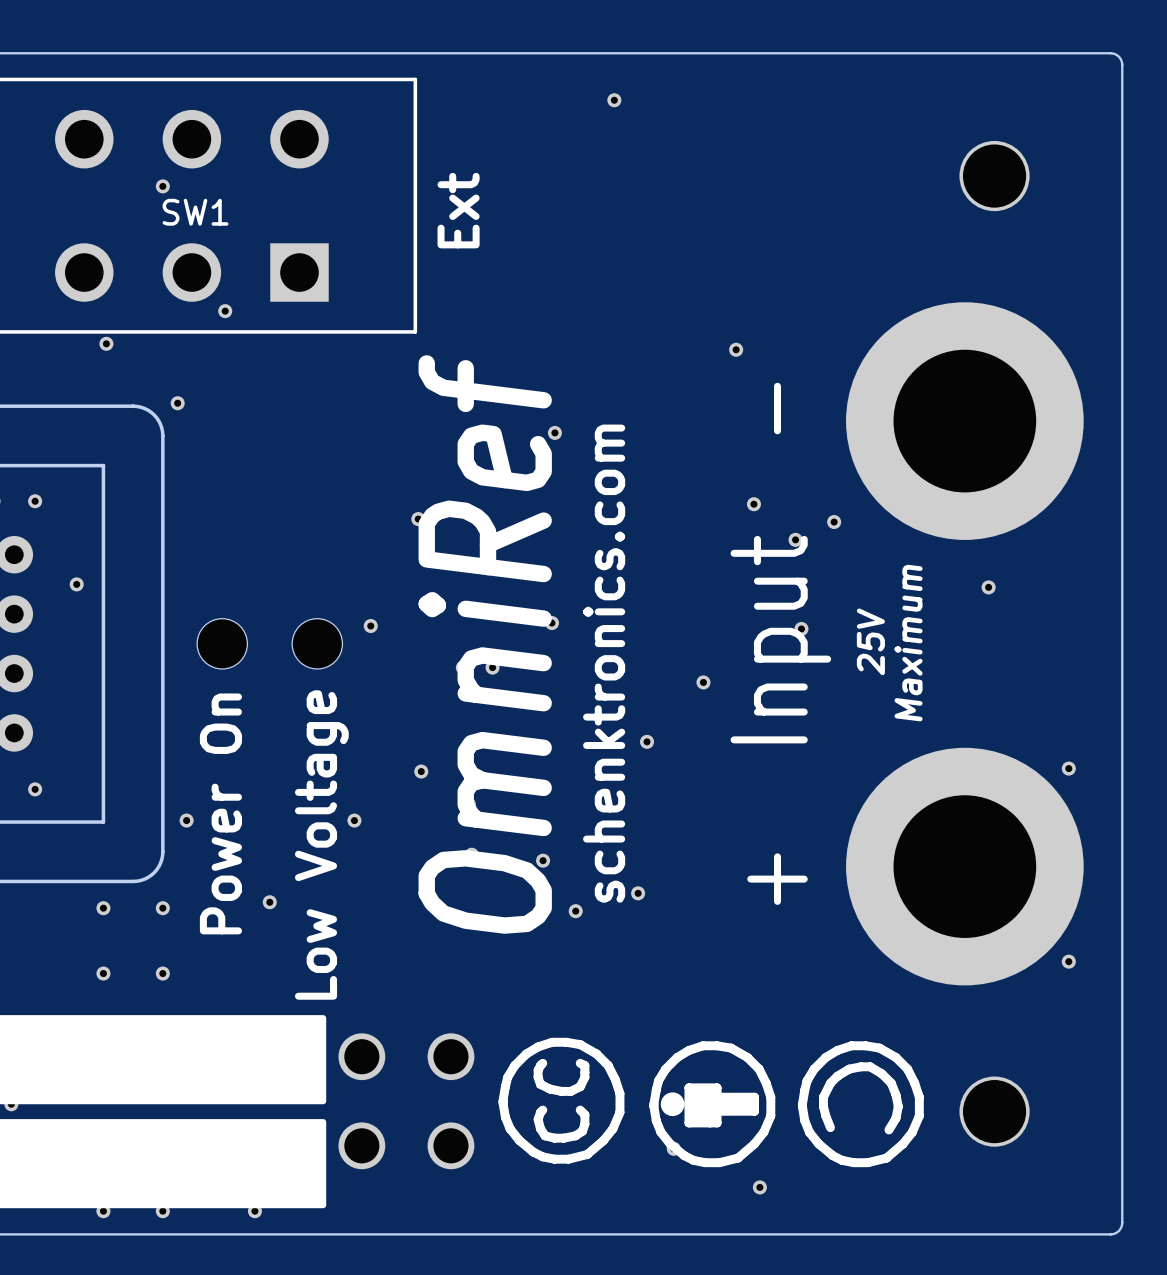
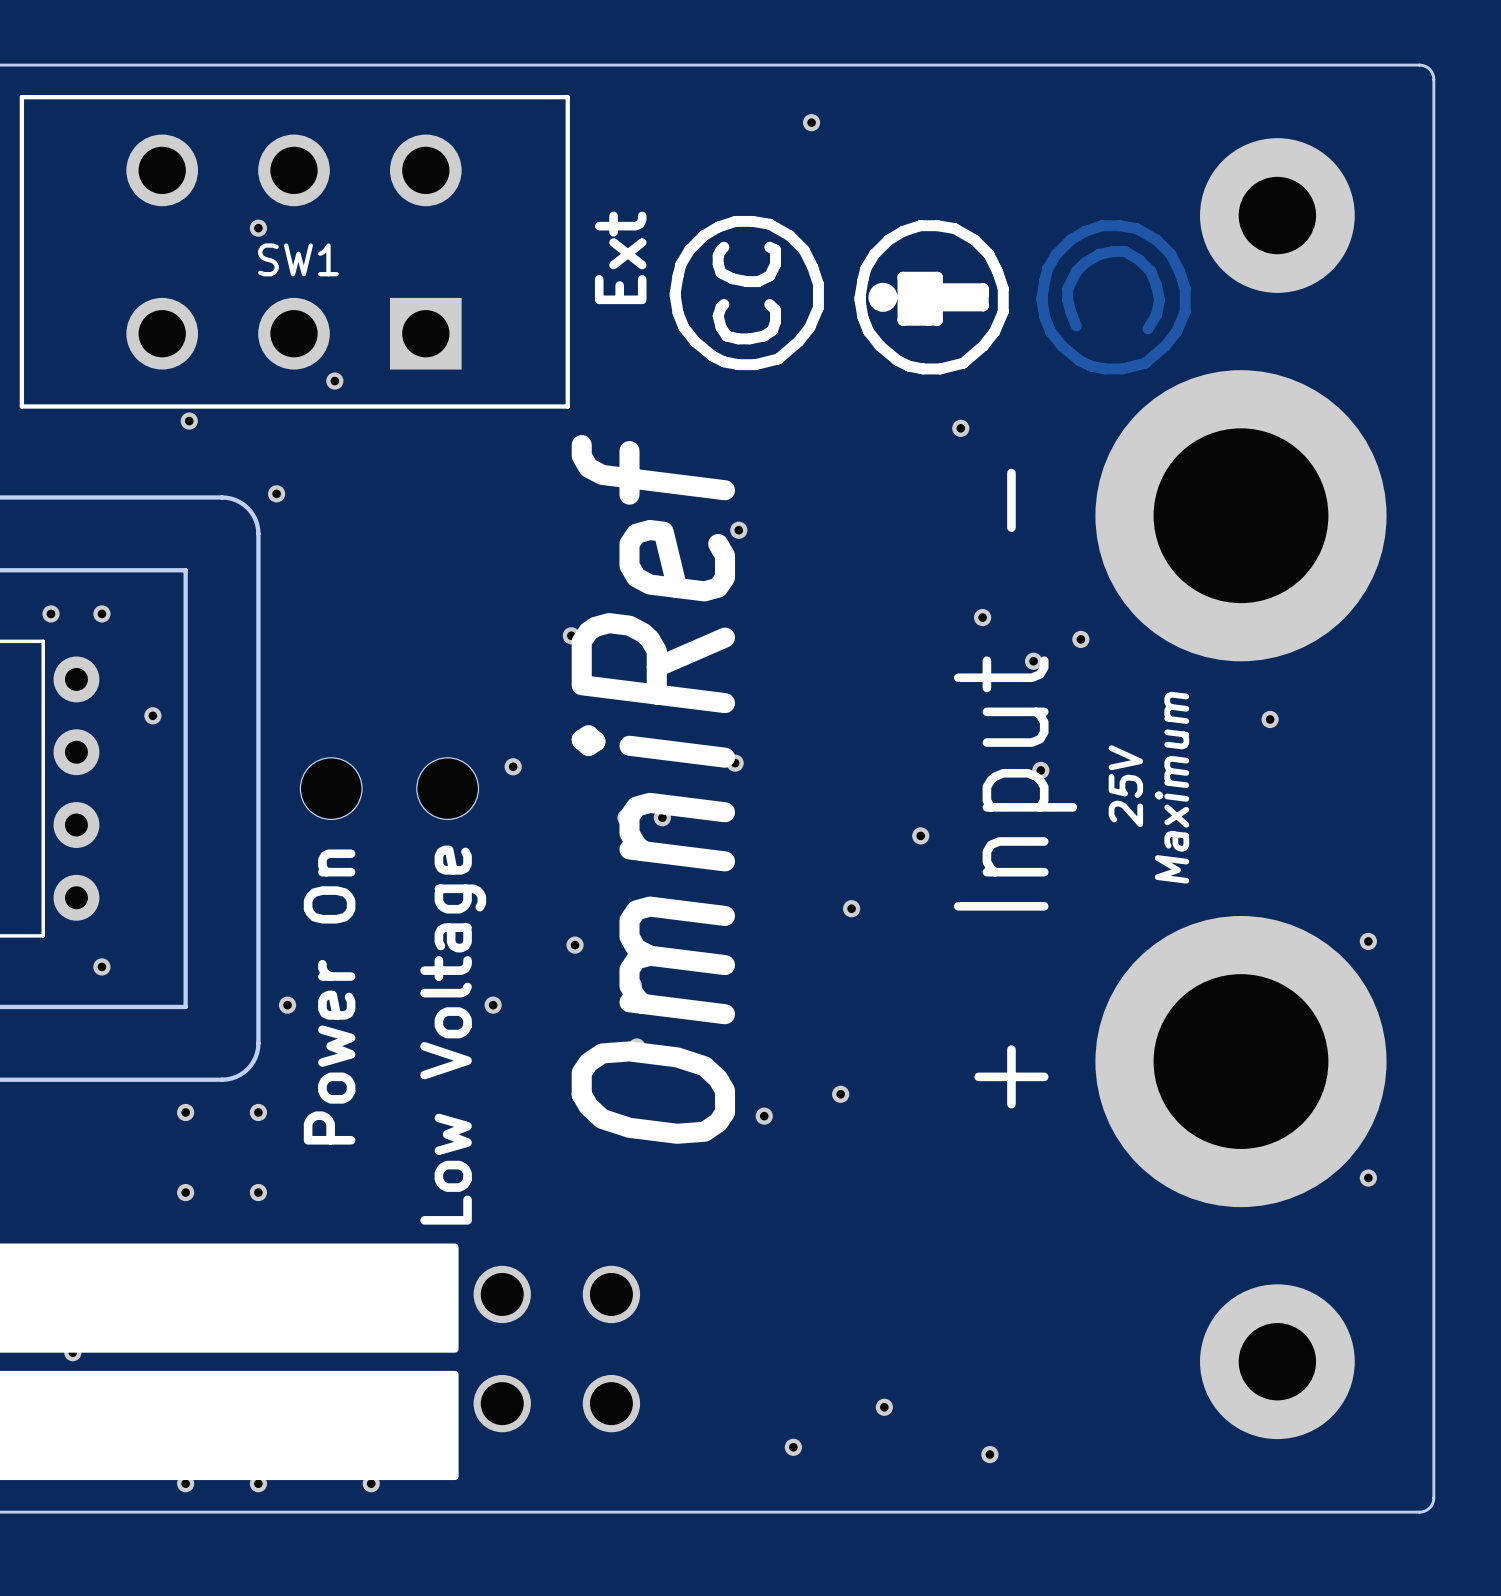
part footprint: [959, 140, 1030, 212] -> [1200, 138, 1355, 293]
drawing: none -> [669, 215, 1191, 375]
text: schenktronics.com (604, 663) -> none
part: (543, 860) -> none
part: (269, 902) -> none
drawing: [498, 1037, 924, 1168] -> none
part footprint: [959, 1076, 1030, 1147] -> [1200, 1284, 1355, 1440]
part: none -> (793, 1447)

